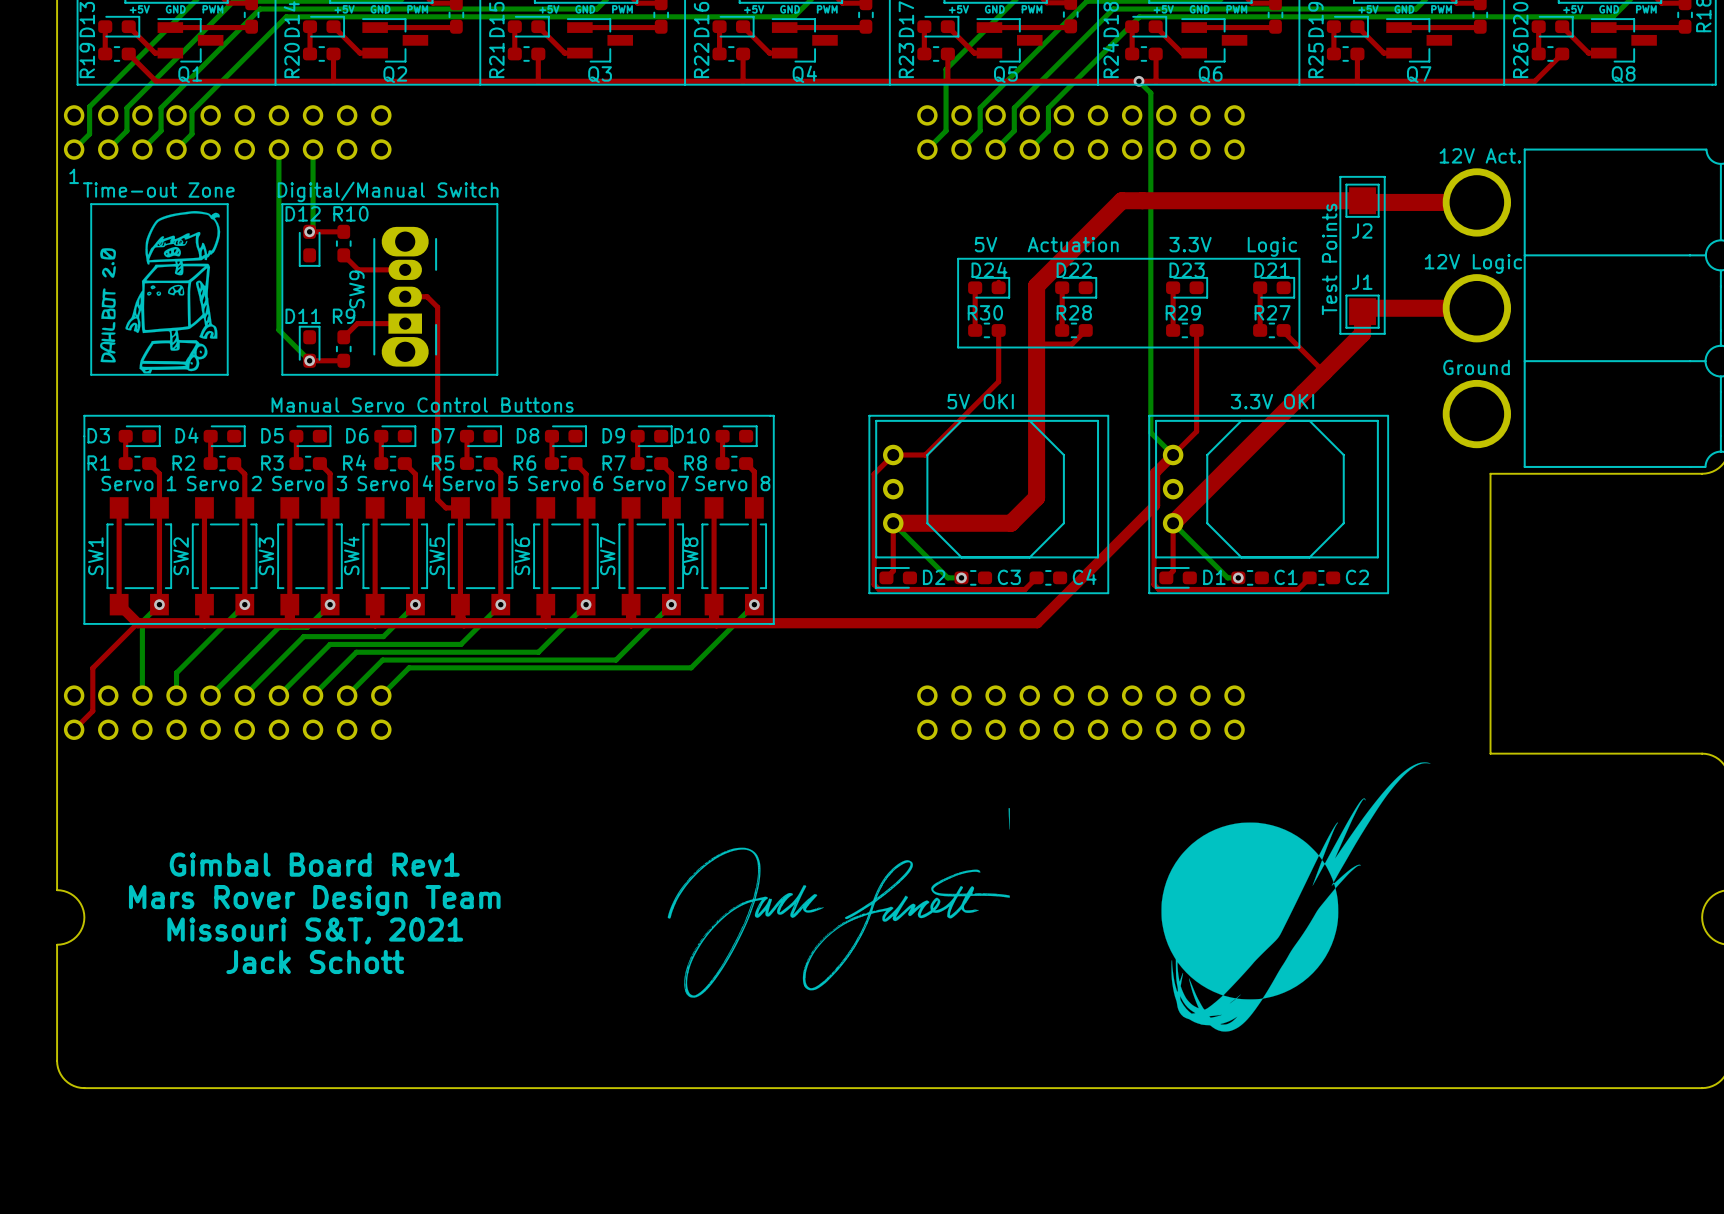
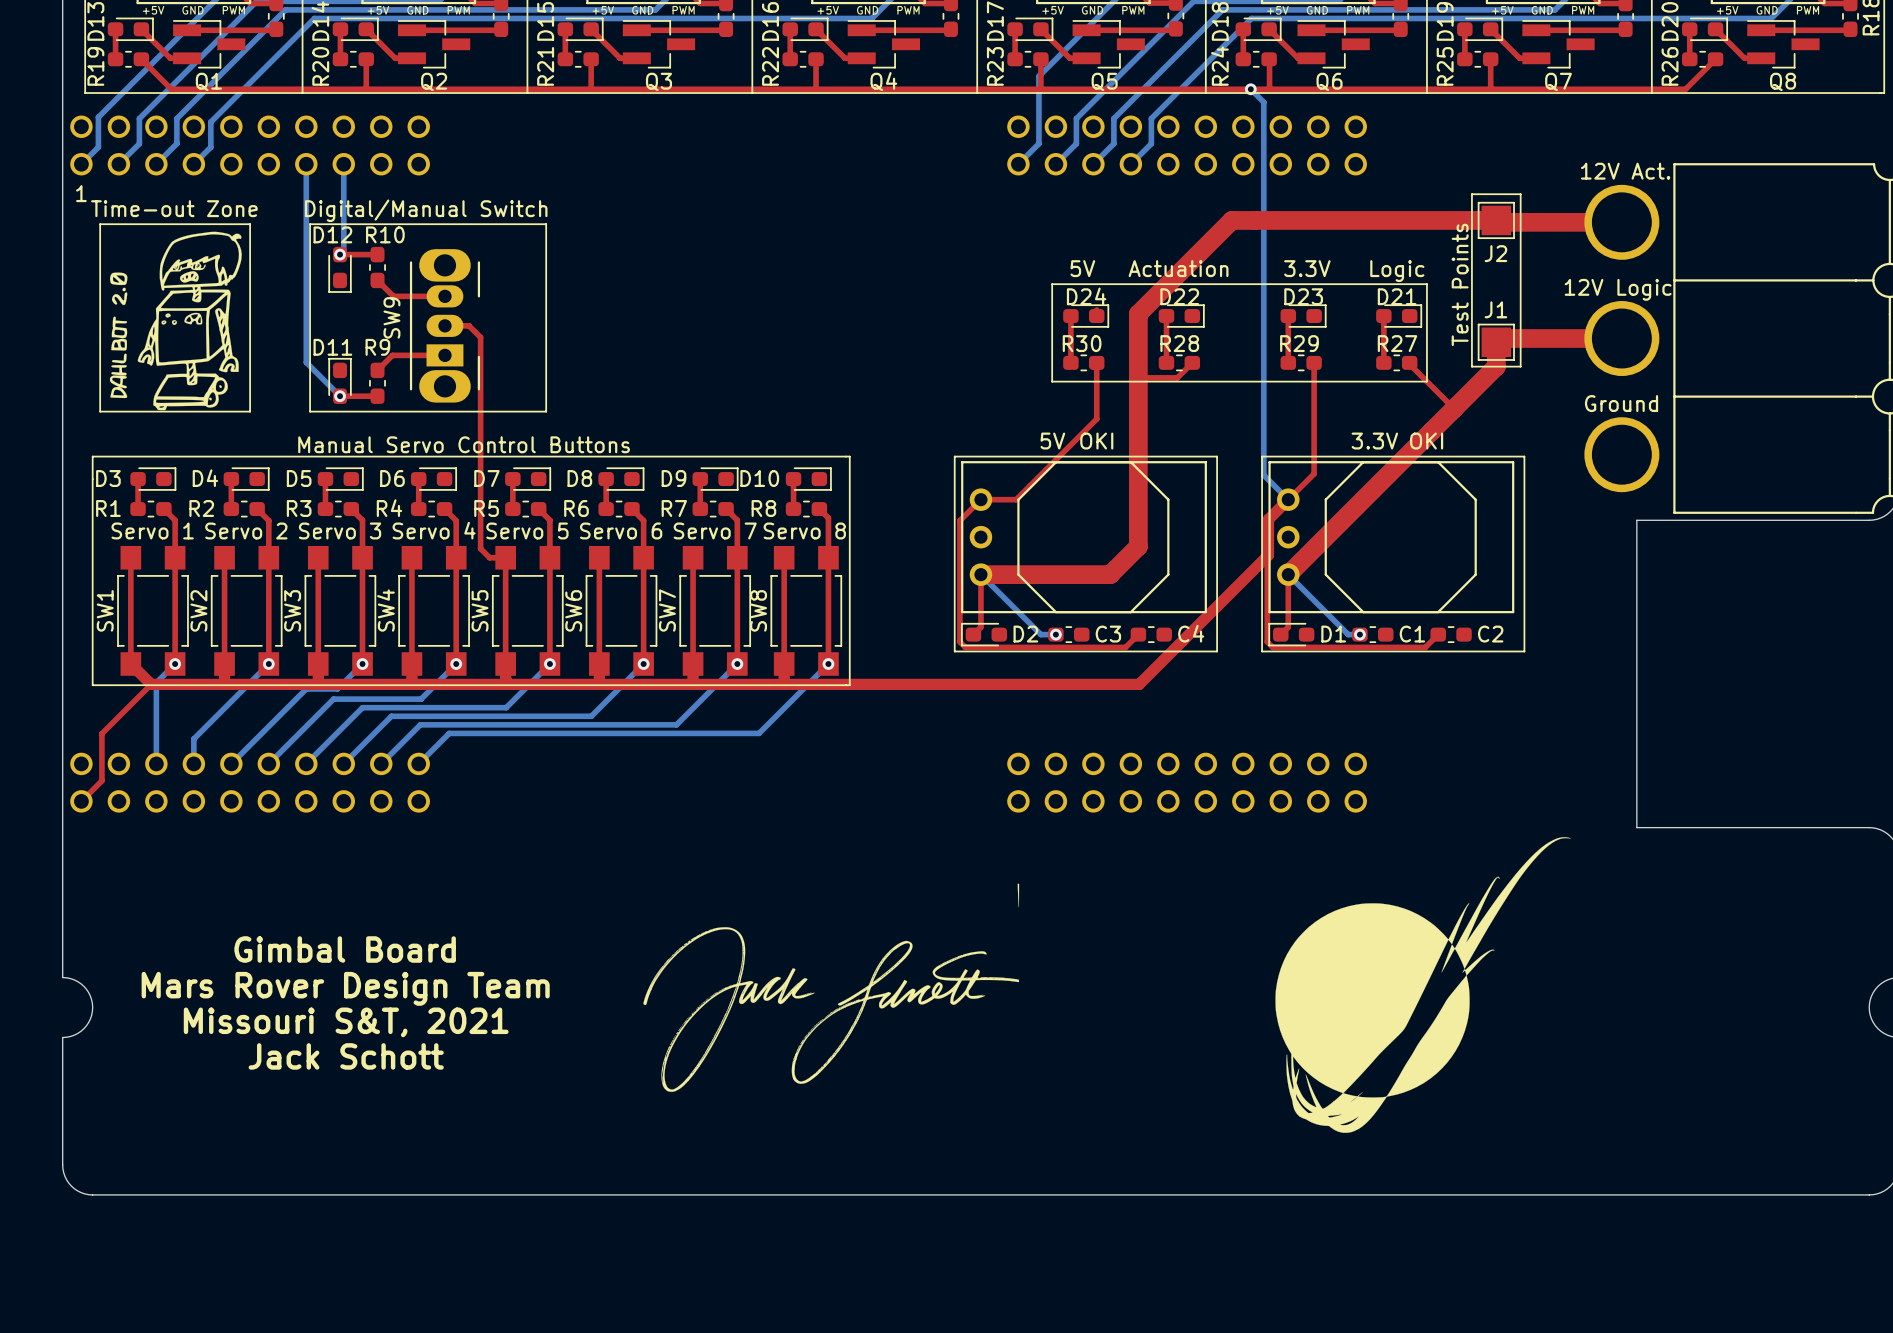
text: Gimbal Board Rev1 (314, 864) -> Gimbal Board (345, 949)
drawing position: (838, 902) -> (831, 987)

